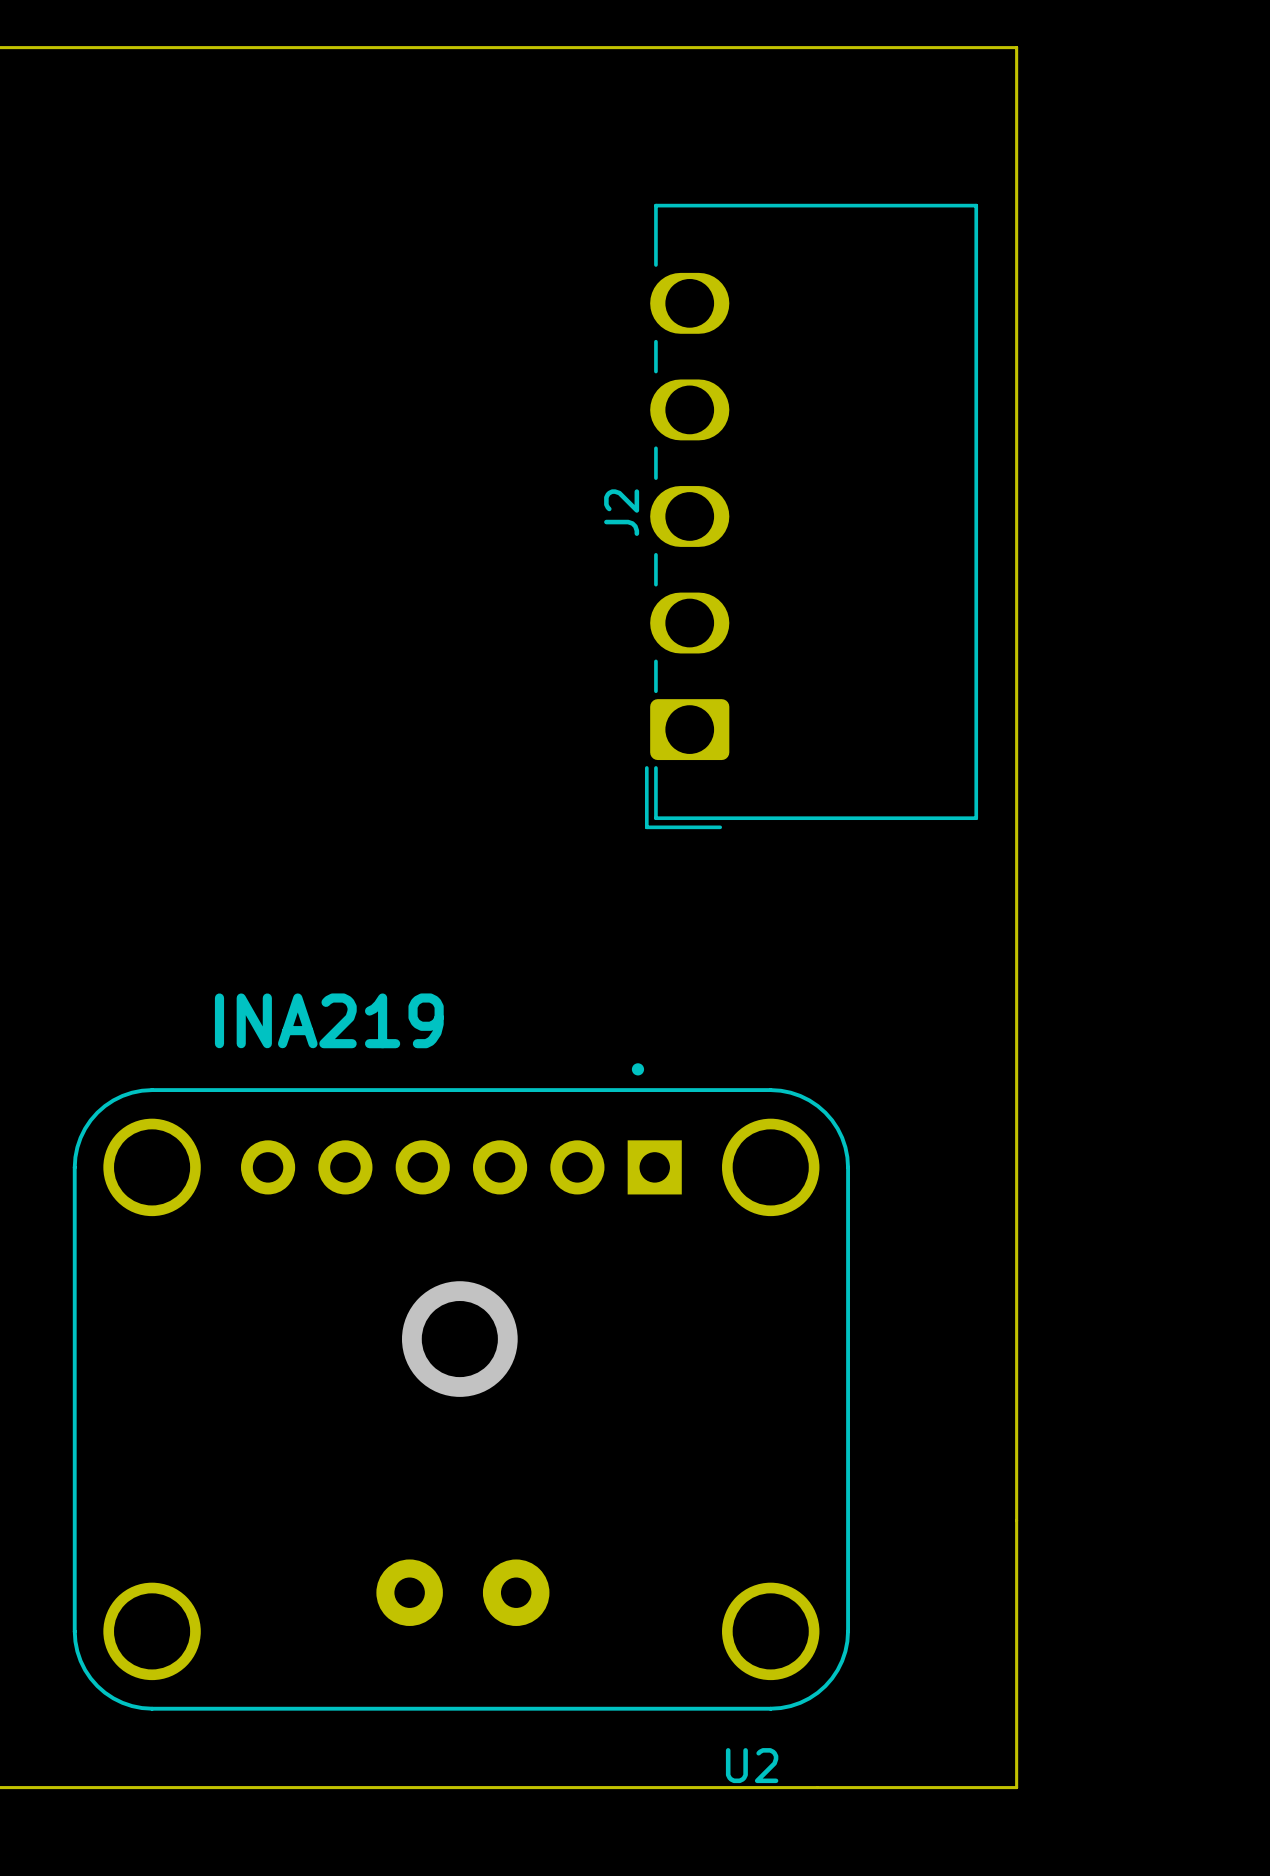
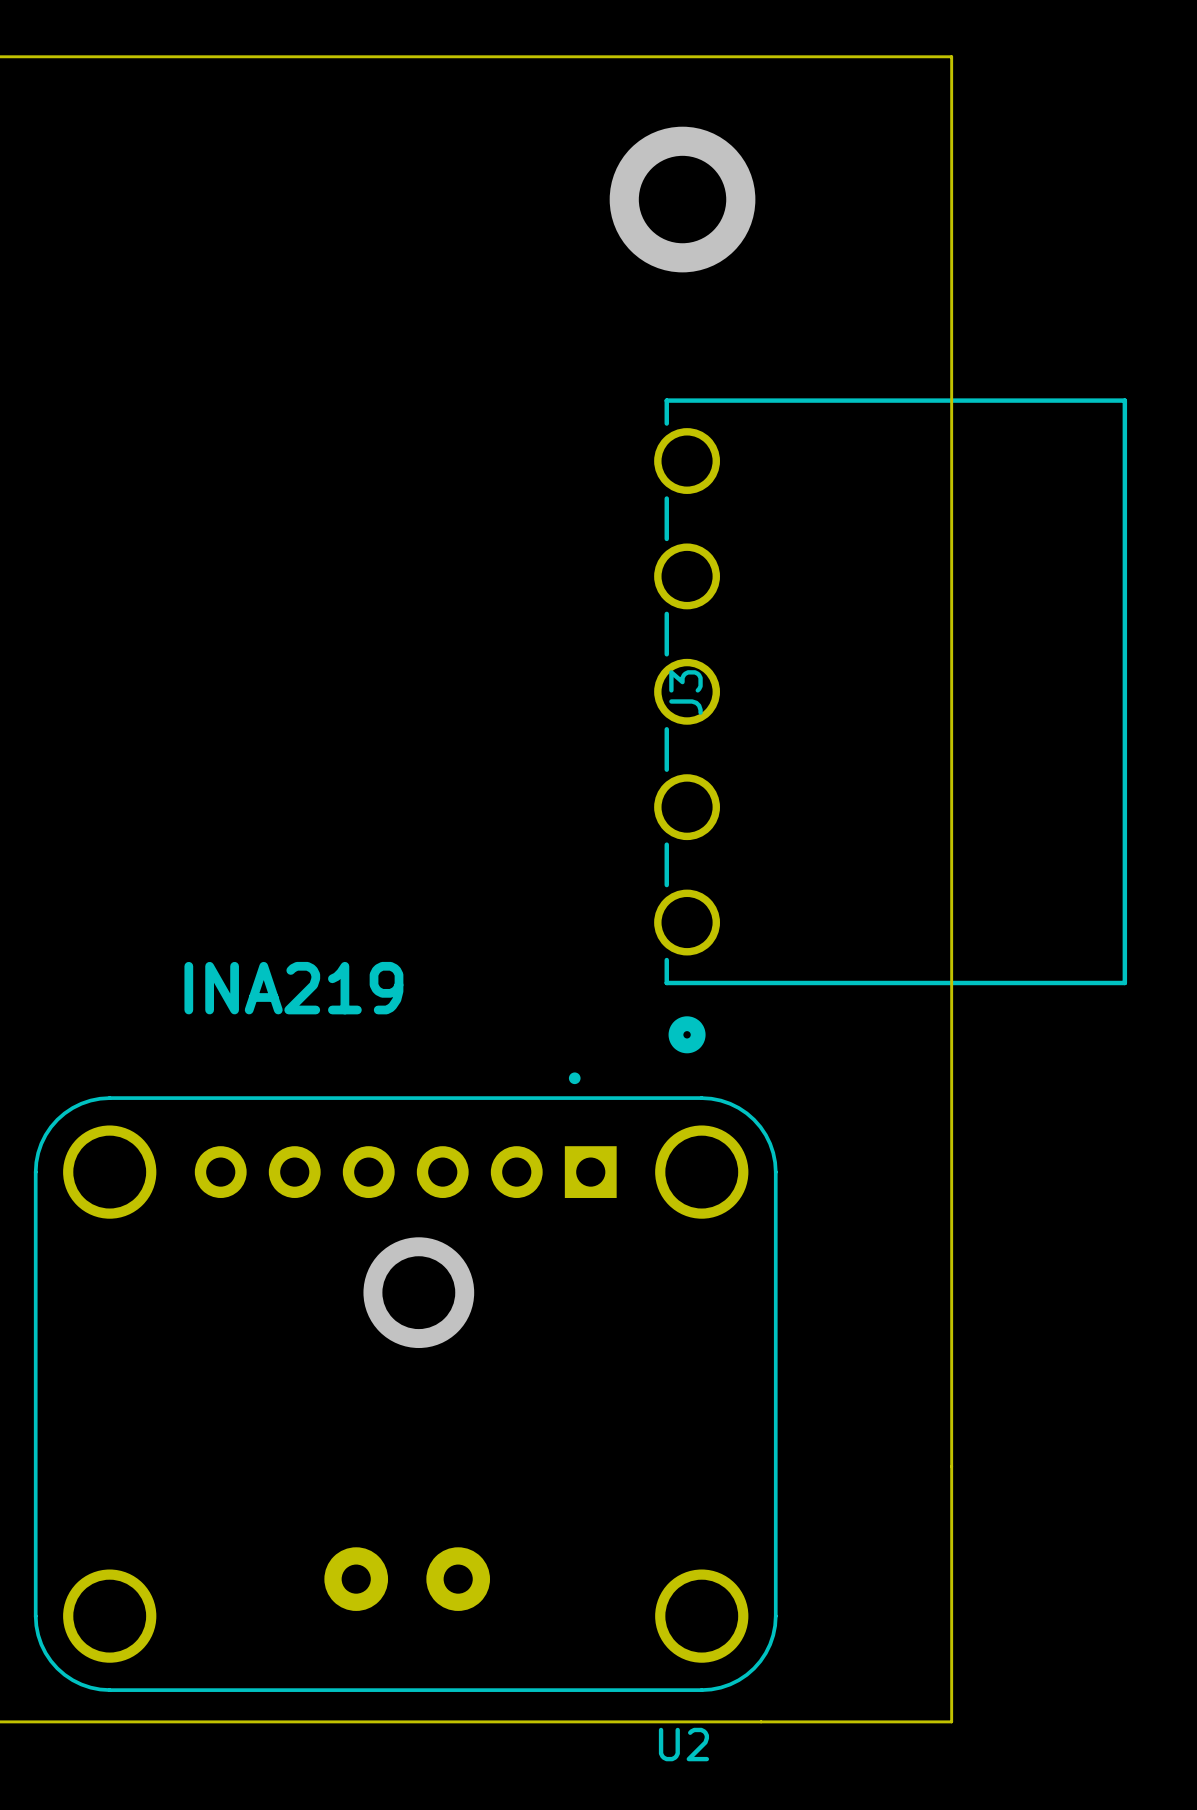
via: none -> (682, 199)
J2: (811, 516) -> none
J3: none -> (890, 725)
U2 position: (461, 1386) -> (405, 1382)

